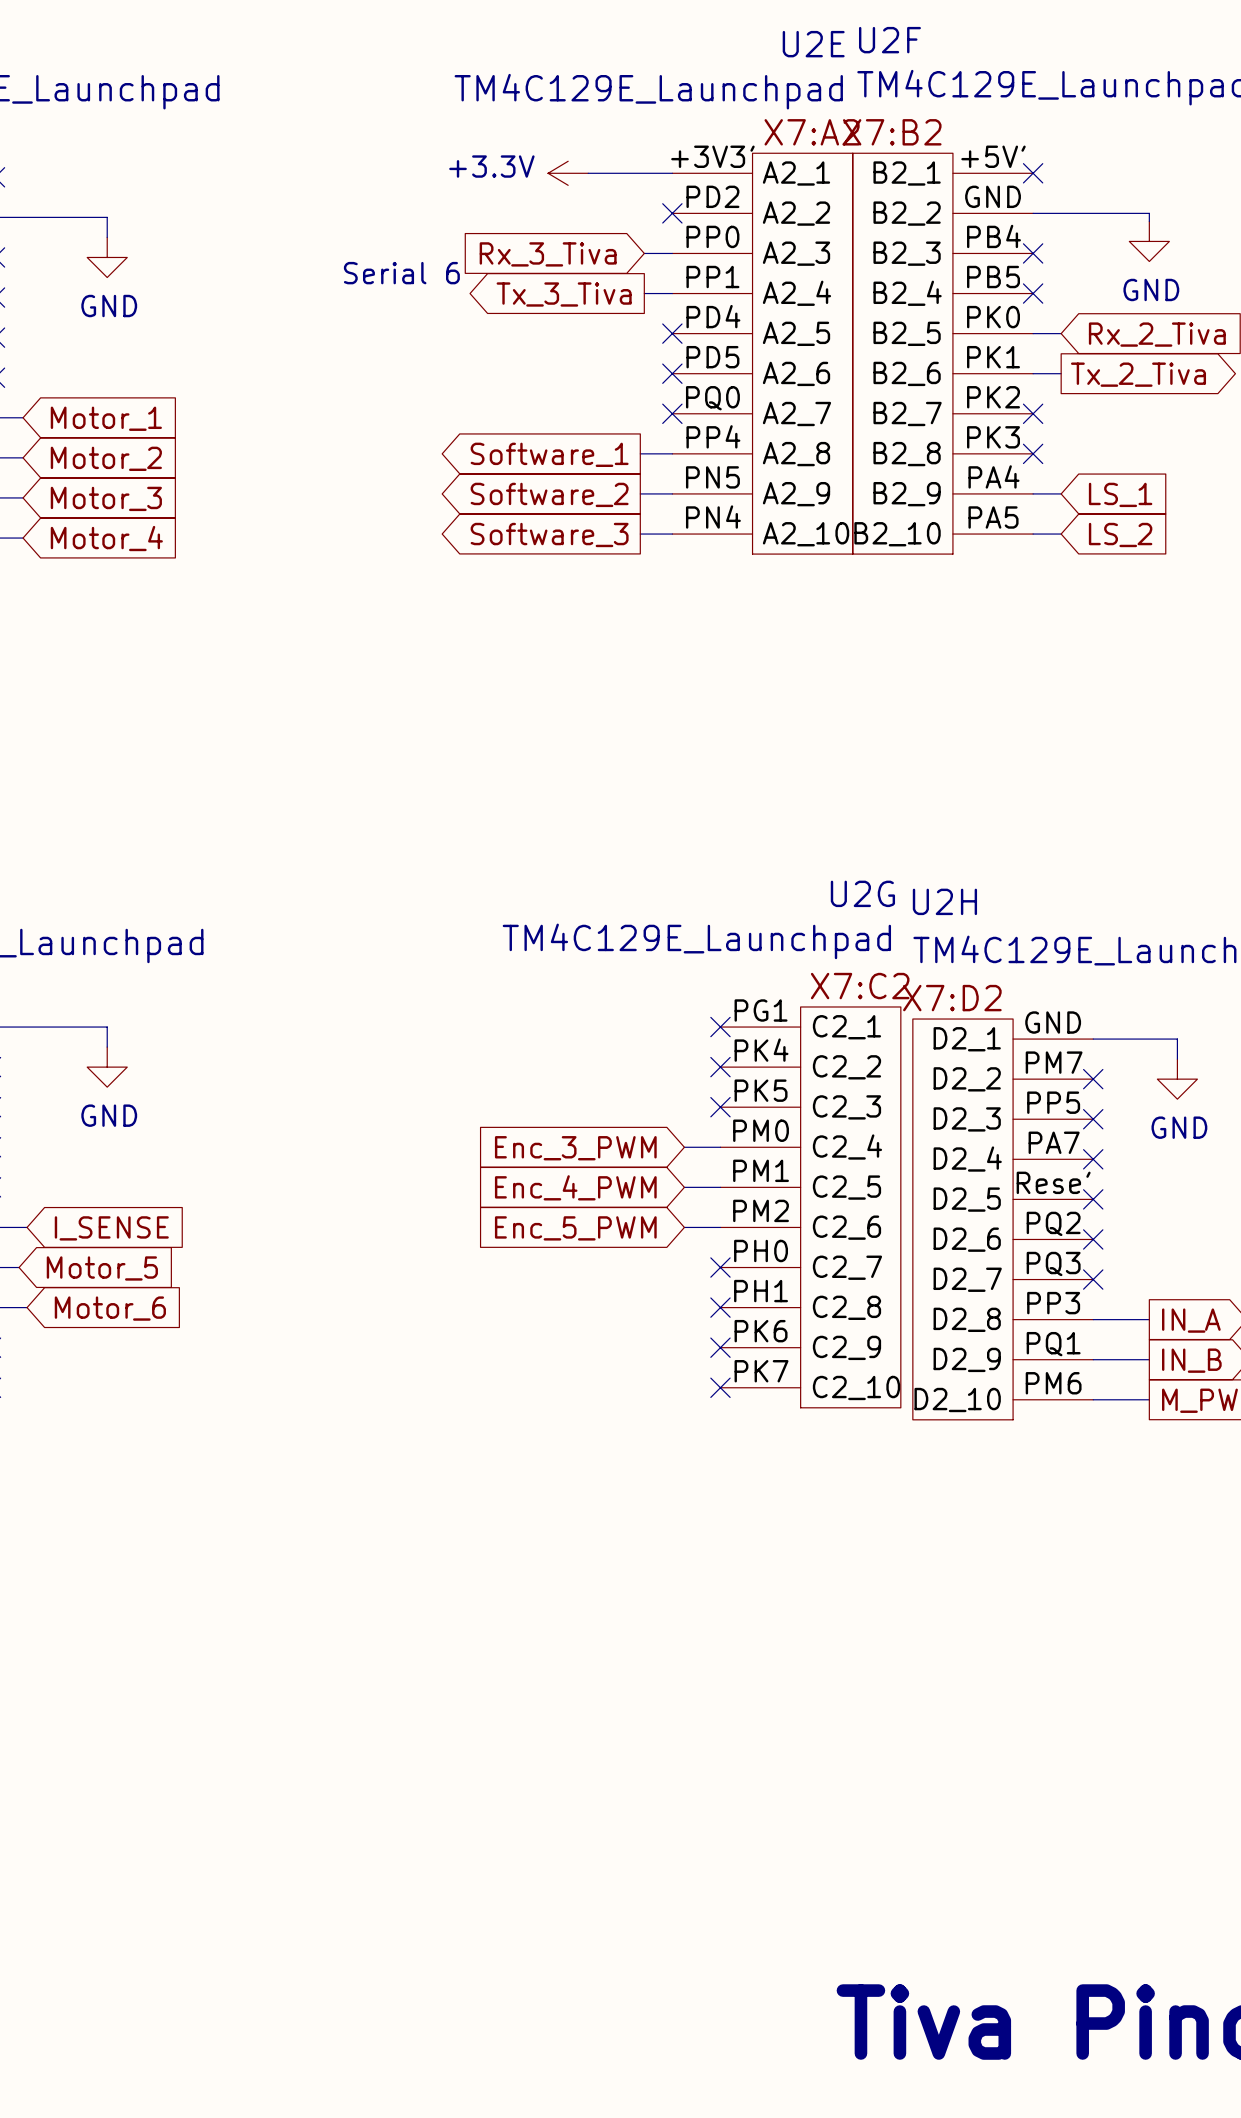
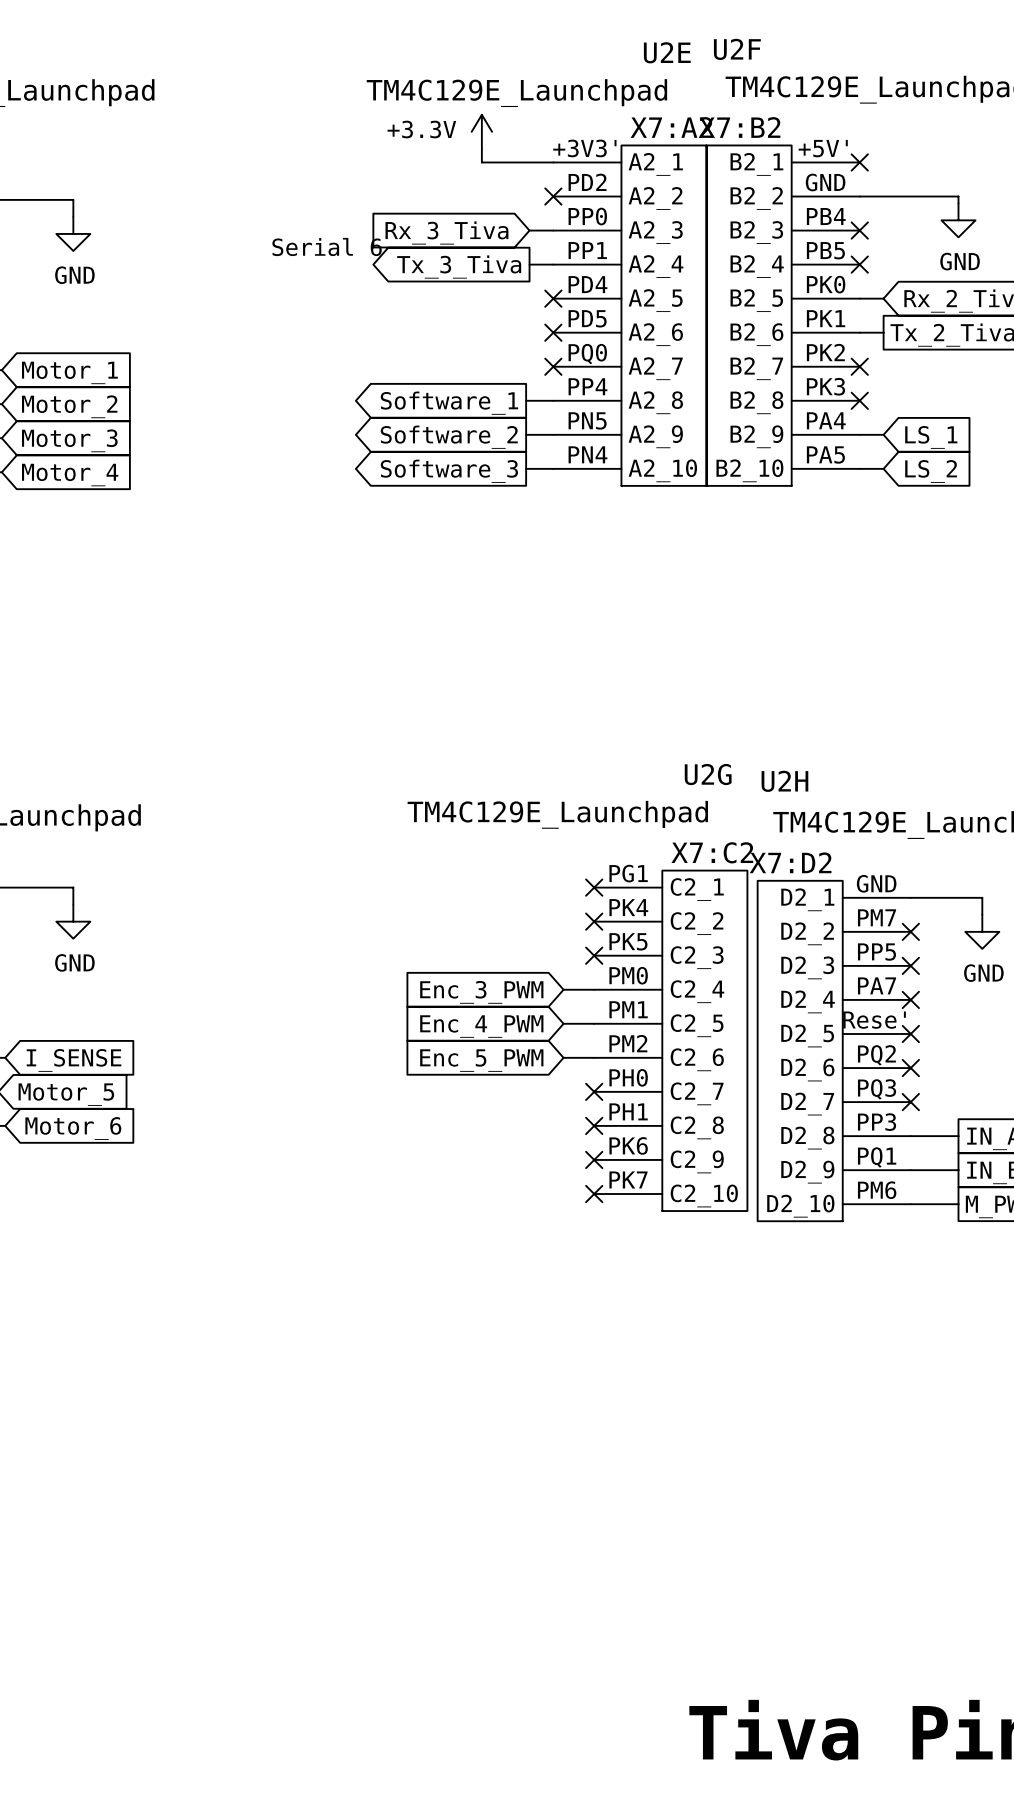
wire: none -> (481, 148) (481, 162)
power symbol rotation: 0° (568, 173) -> 90° clockwise (481, 131)
power symbol position: +3.3V (568, 173) -> +3.3V (481, 131)

